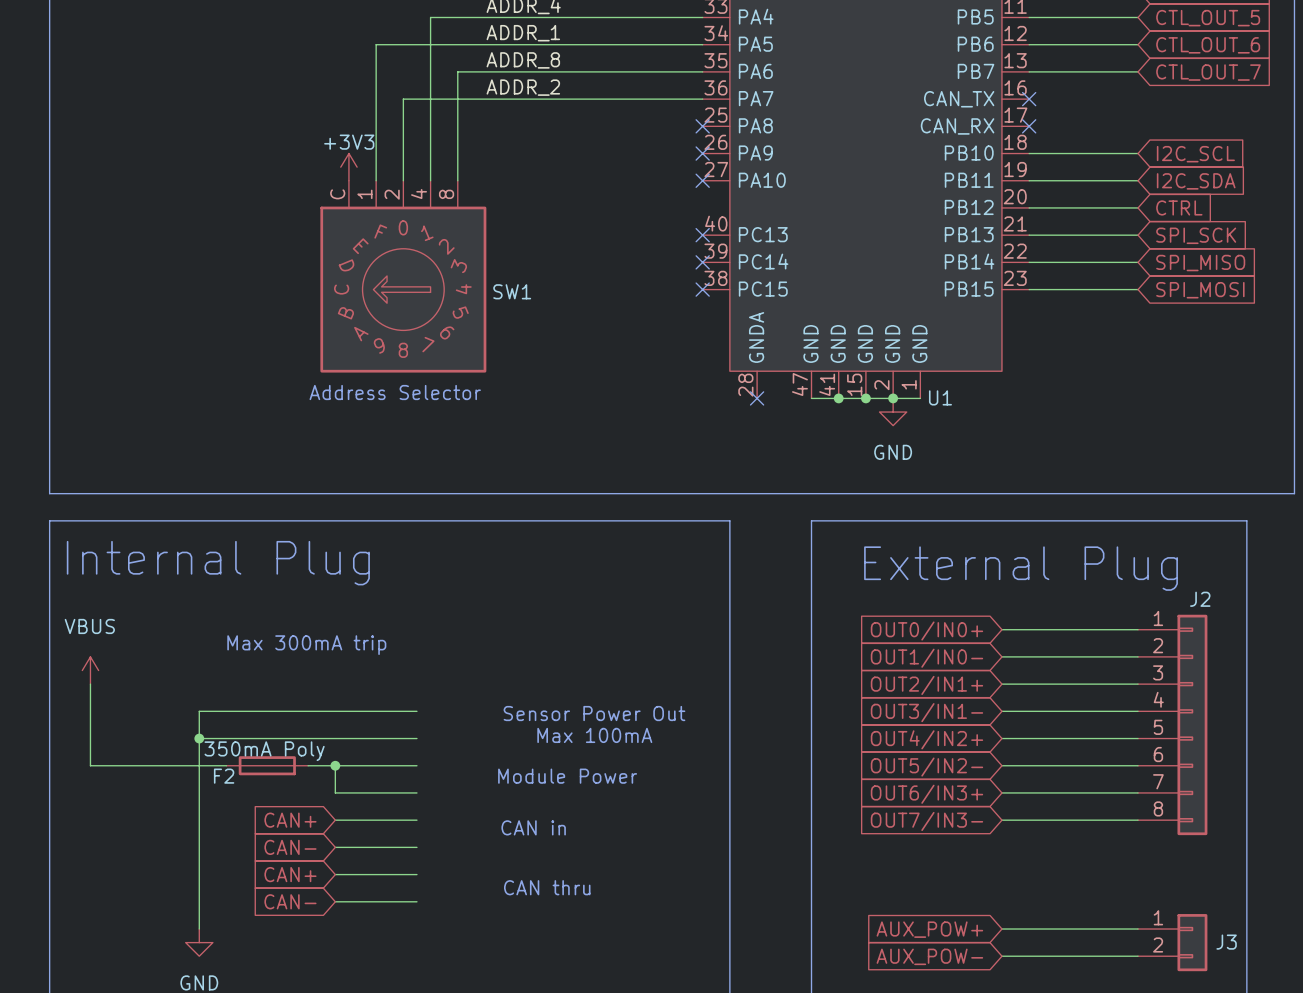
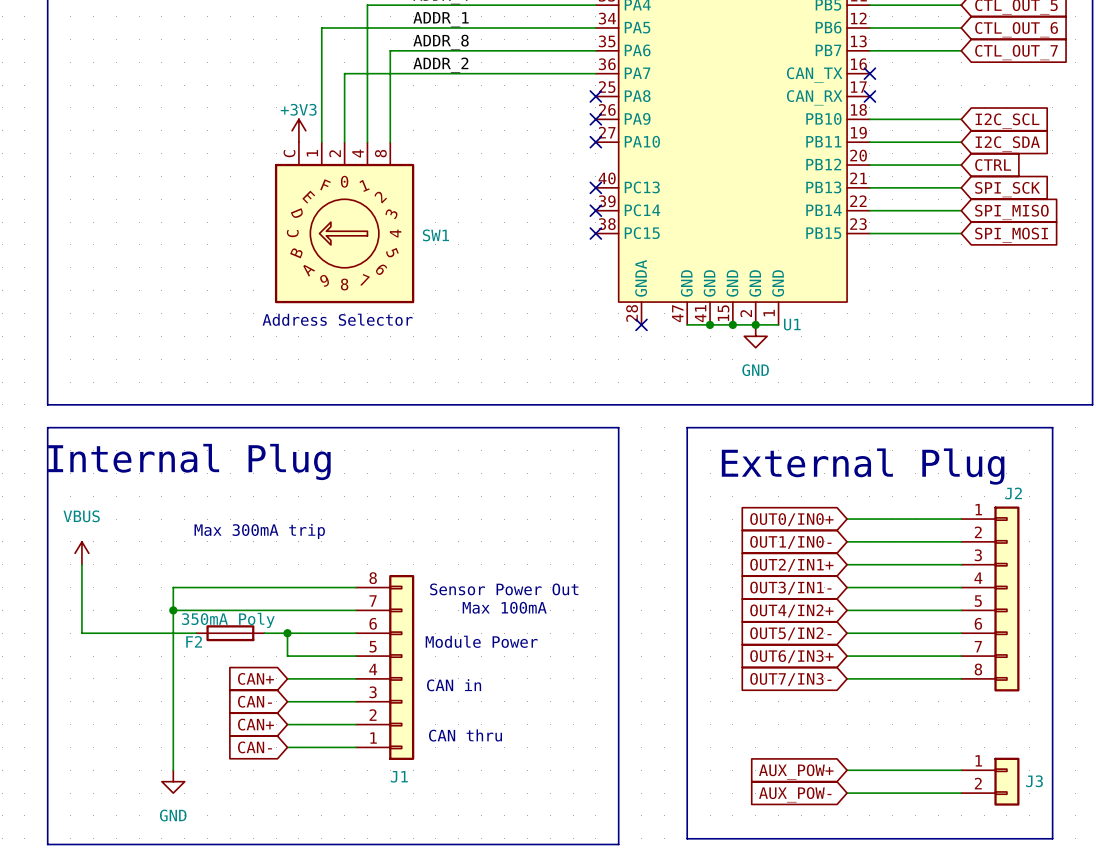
J1: none -> (385, 667)

